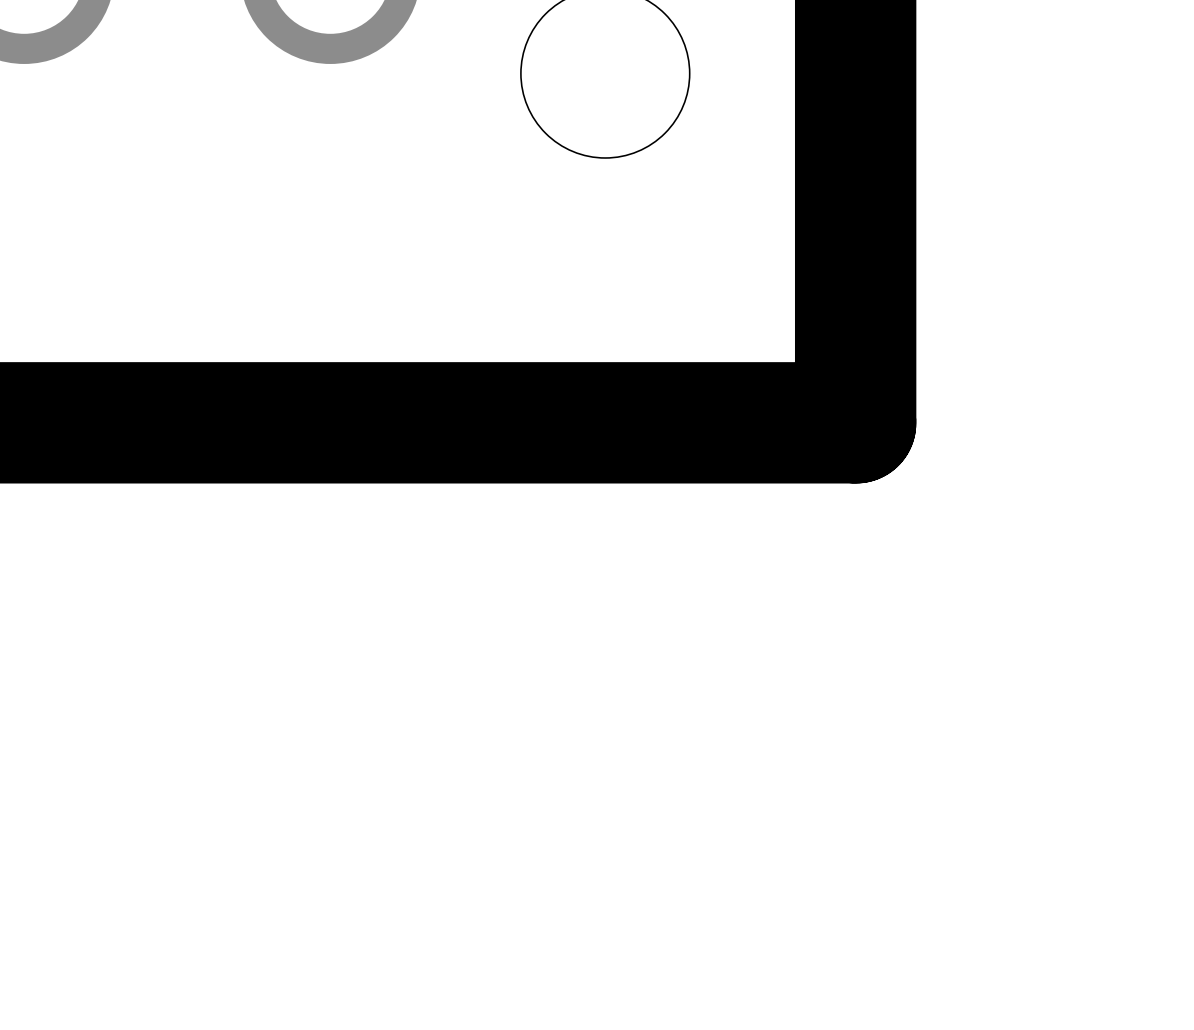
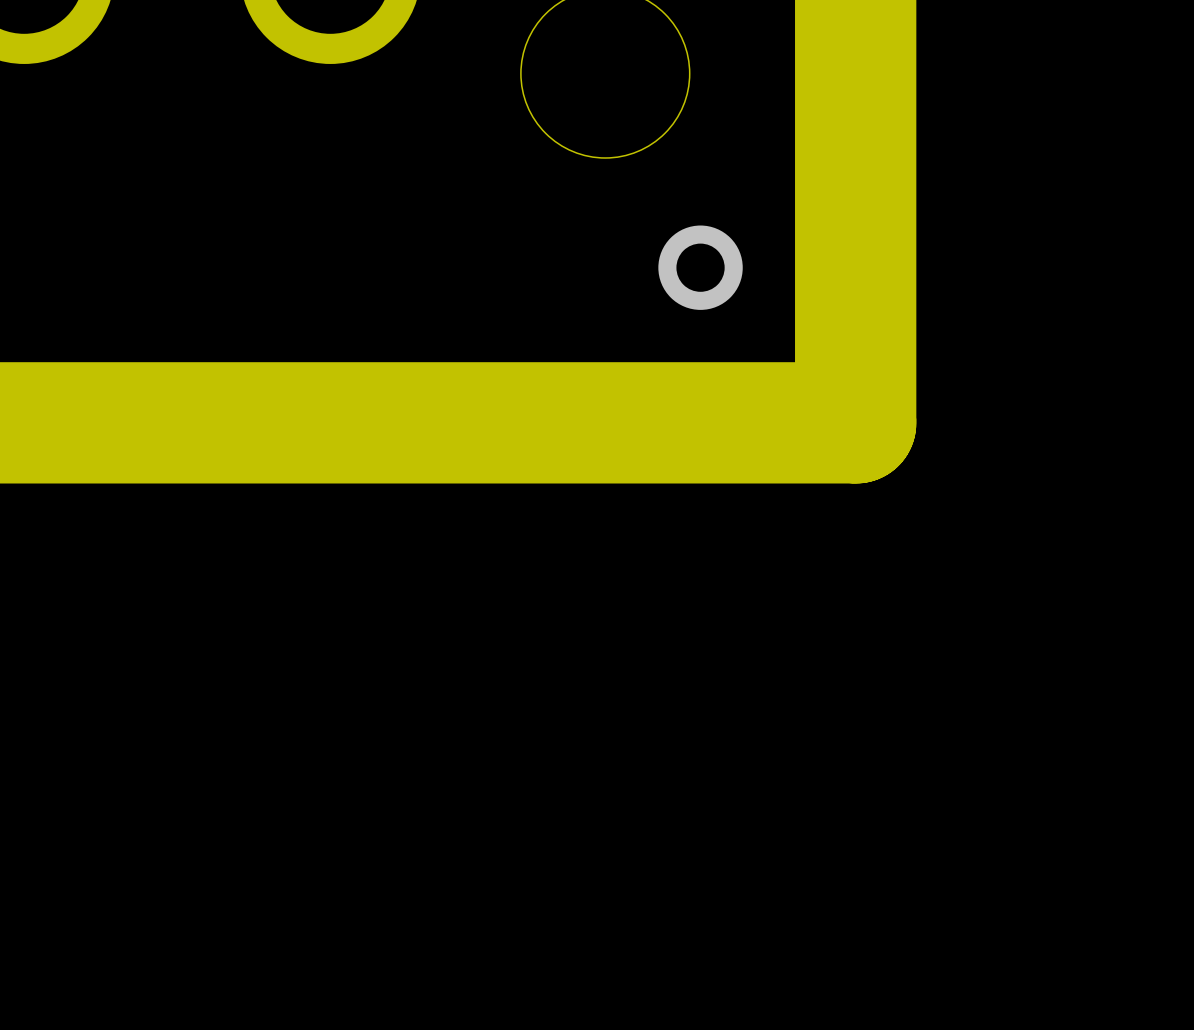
via: none -> (700, 267)

